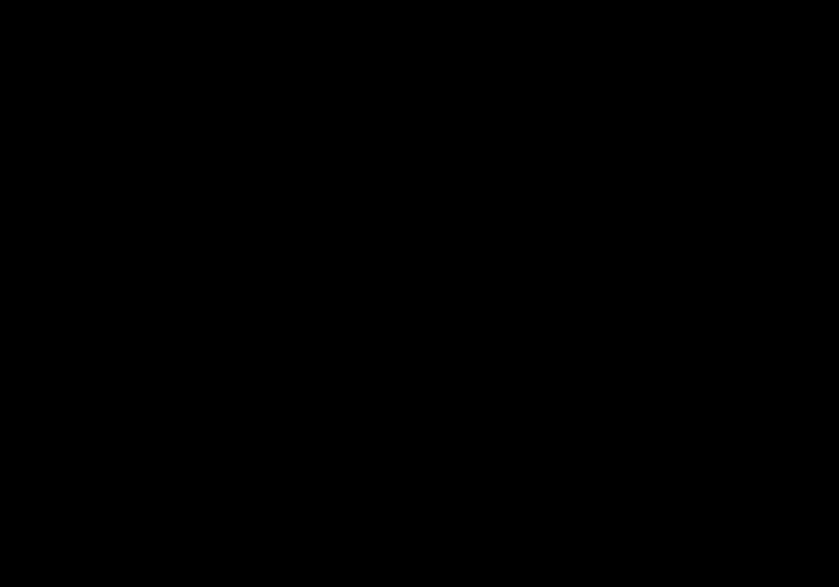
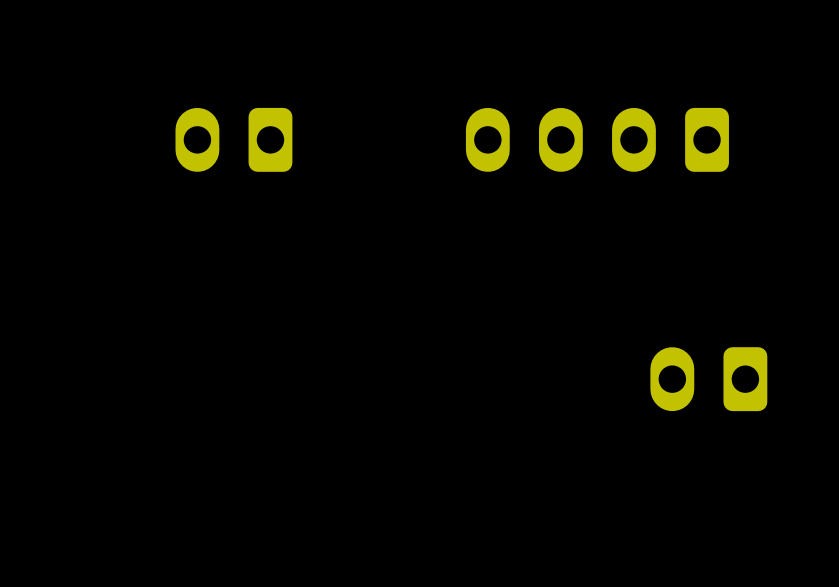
part: none -> (233, 139)
part: none -> (597, 139)
part: none -> (708, 379)

